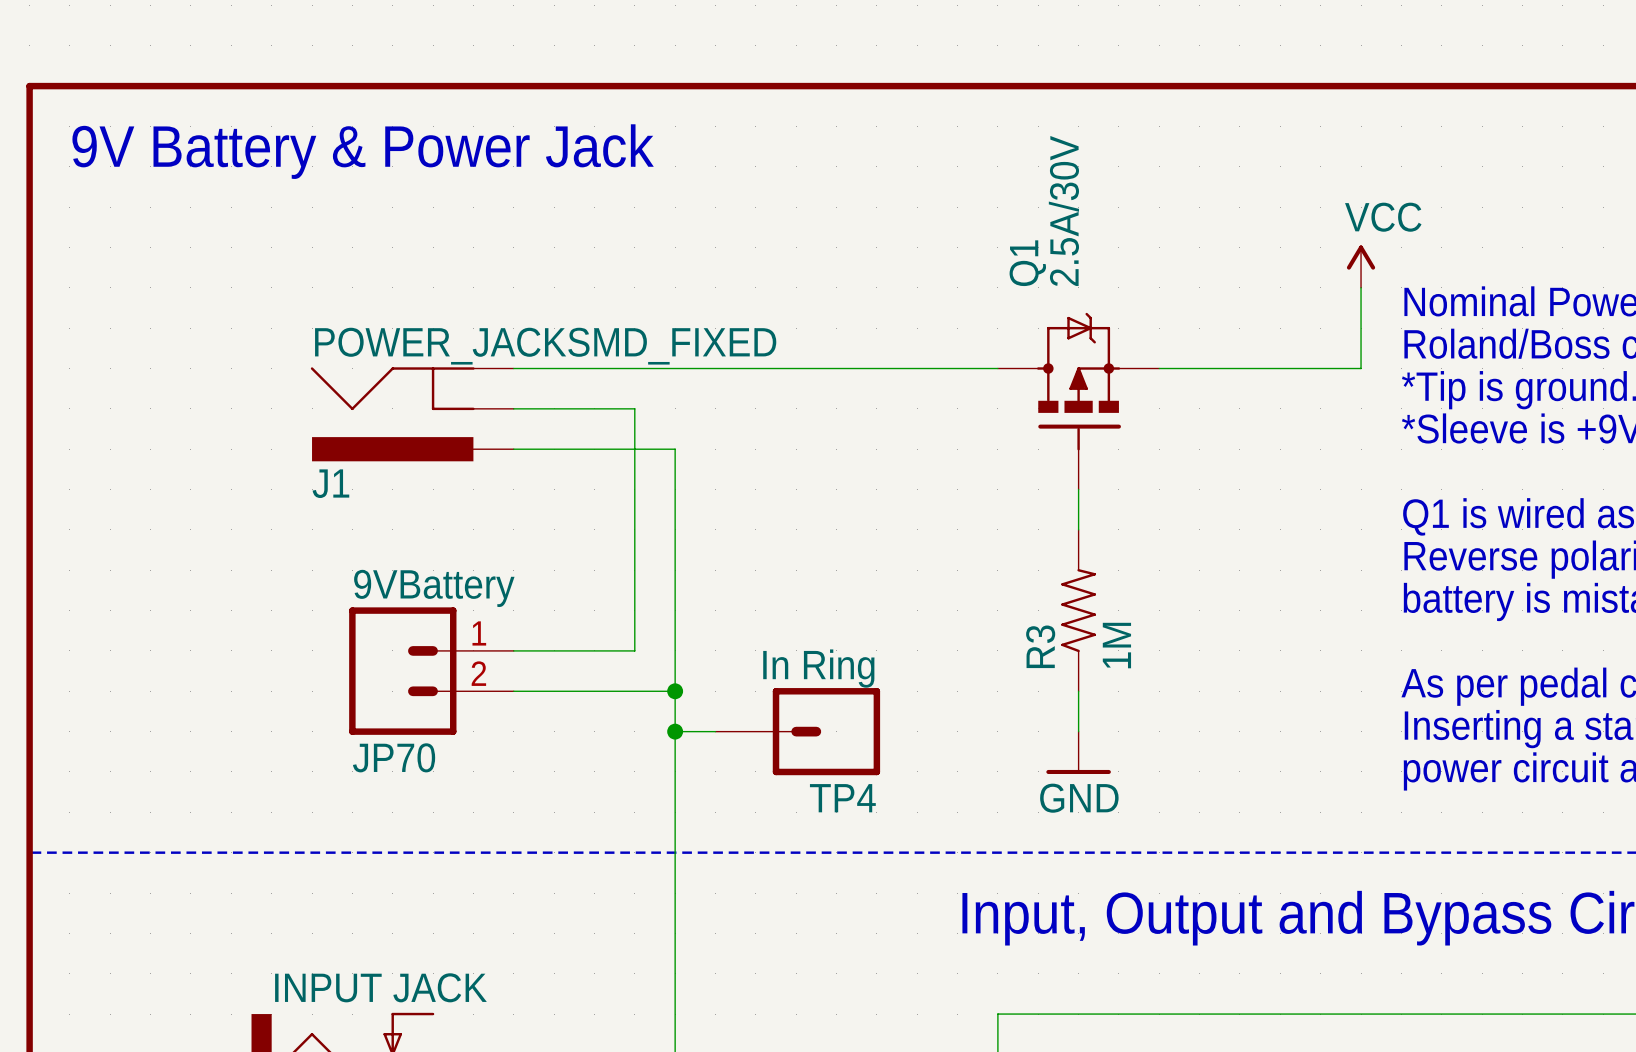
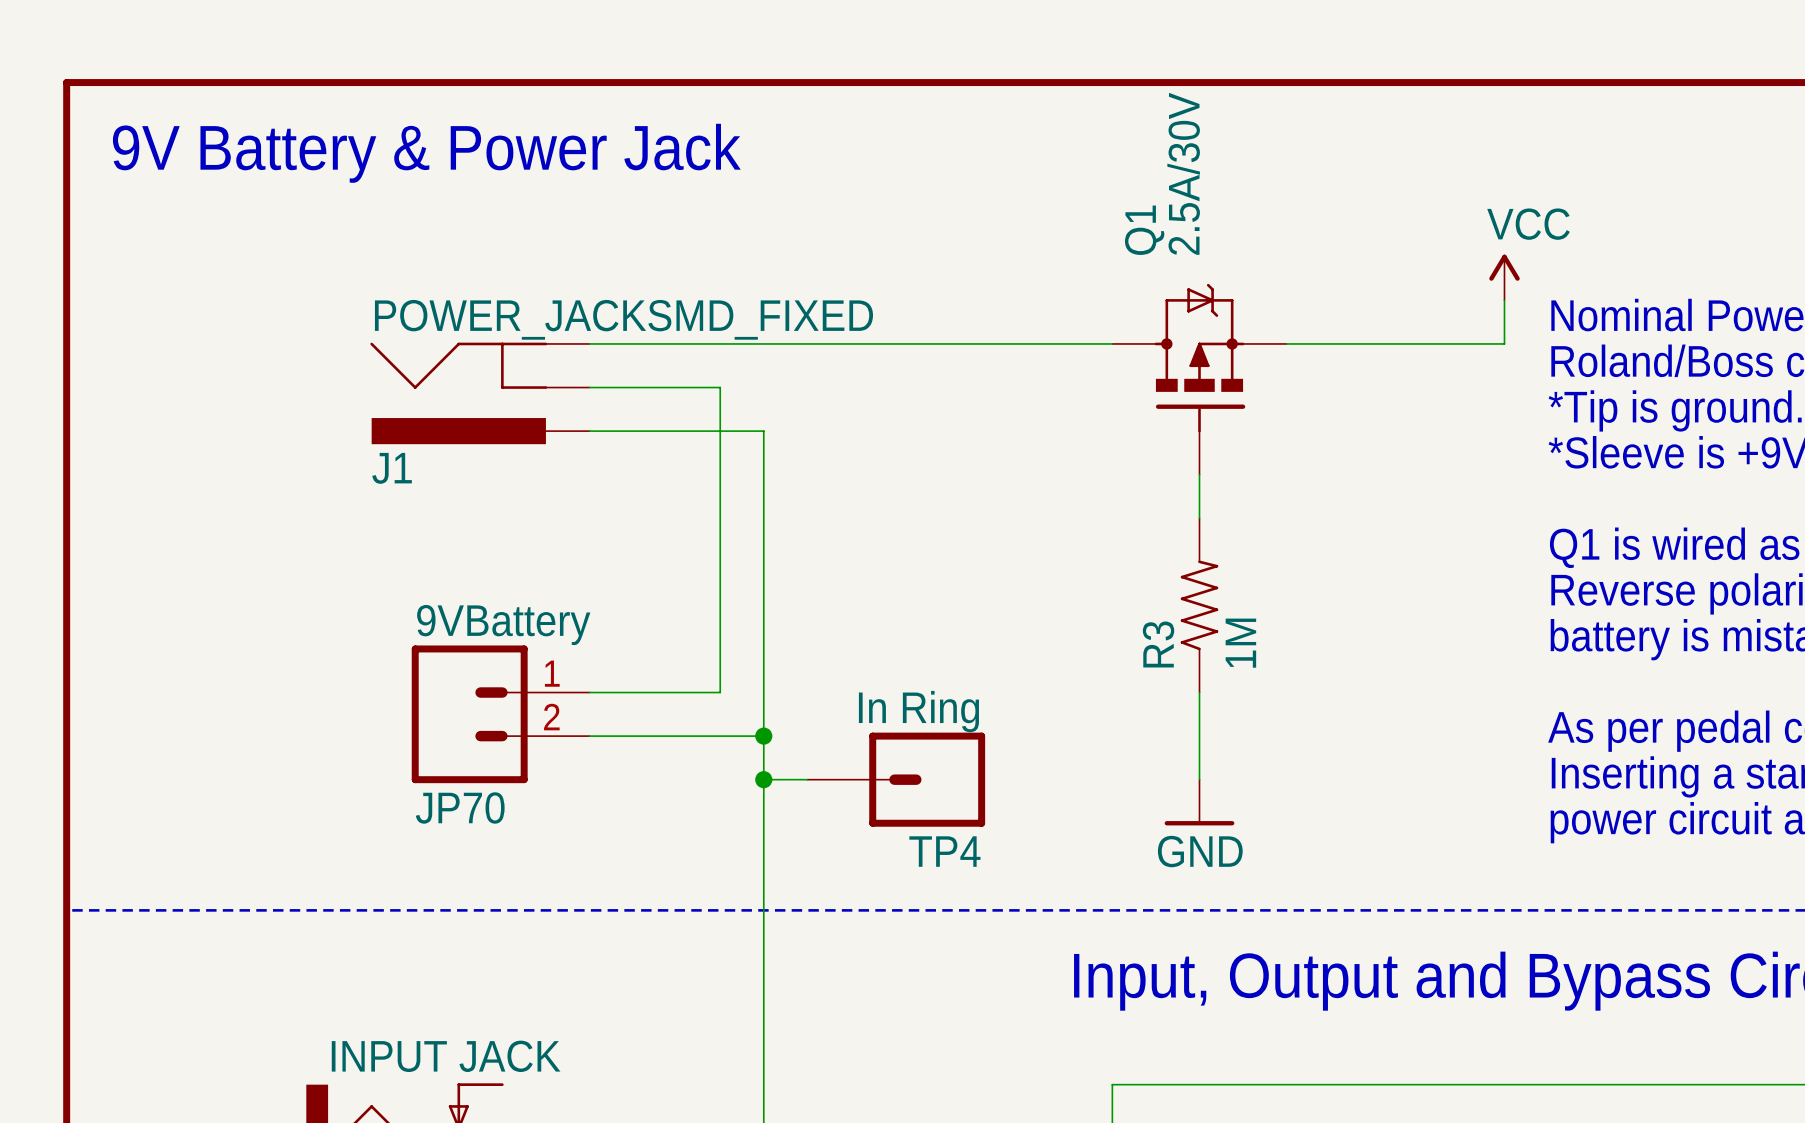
wire: none -> (589, 343) (1112, 343)
wire: (1361, 328) (1361, 368) (1159, 368) -> (1504, 343) (1286, 343)
wire: (634, 368) (997, 368) -> none
Q1 position: (1078, 401) -> (1199, 379)
J1 position: (412, 414) -> (479, 393)
wire: (513, 449) (675, 449) -> (720, 387) (720, 431) (763, 431) (763, 474)
R3 position: (1078, 610) -> (1199, 605)

